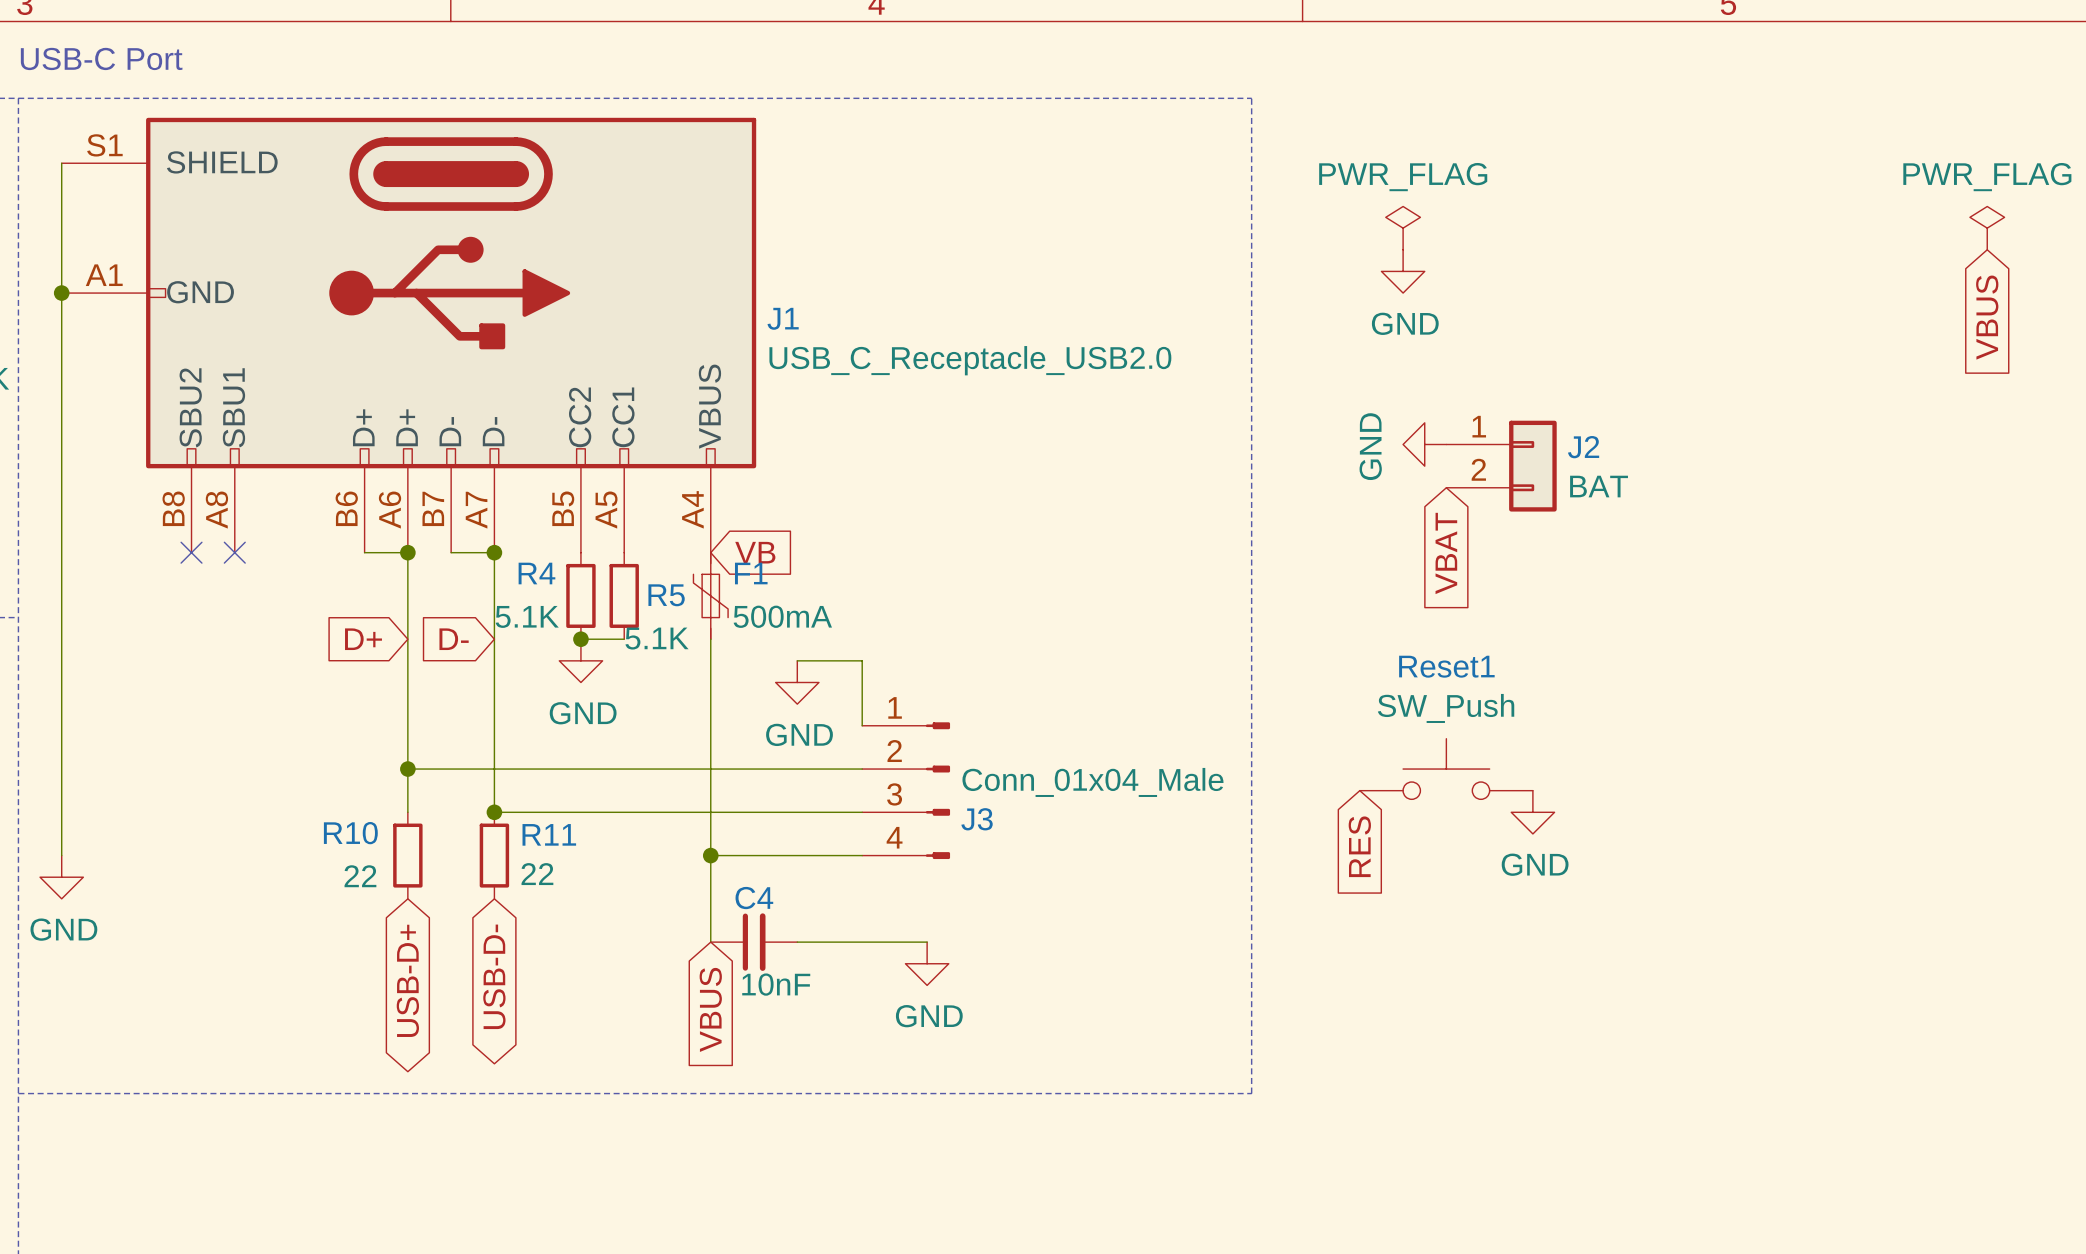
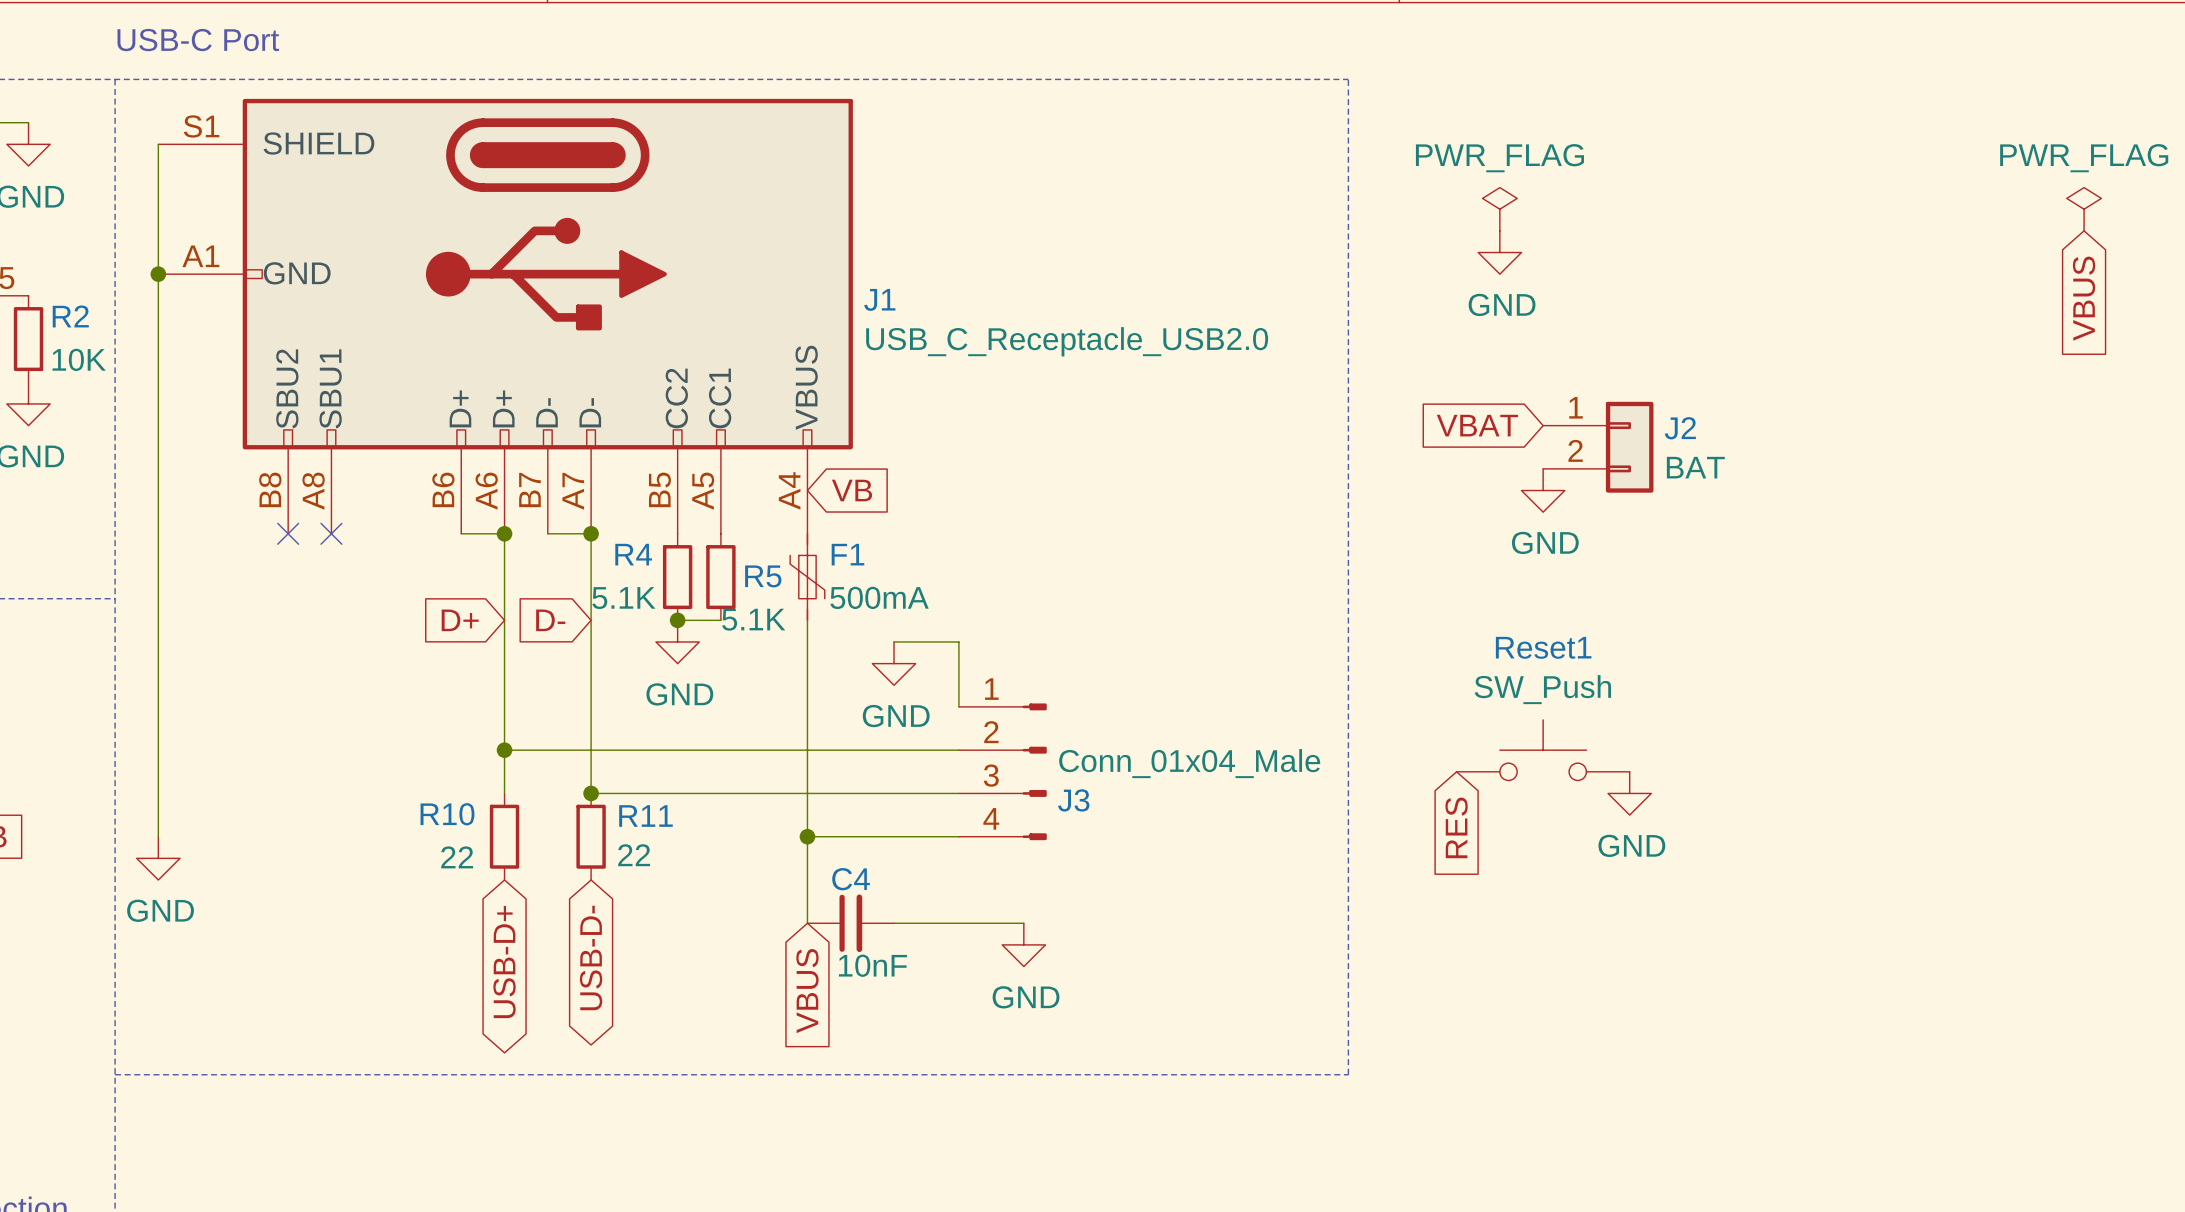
power symbol rotation: 0° (1424, 444) -> 90° counterclockwise (1543, 490)
power symbol position: GND (1424, 444) -> GND (1543, 490)
global label position: VB (755, 552) -> VB (852, 490)
global label rotation: 0° (1446, 553) -> 90° clockwise (1477, 425)

